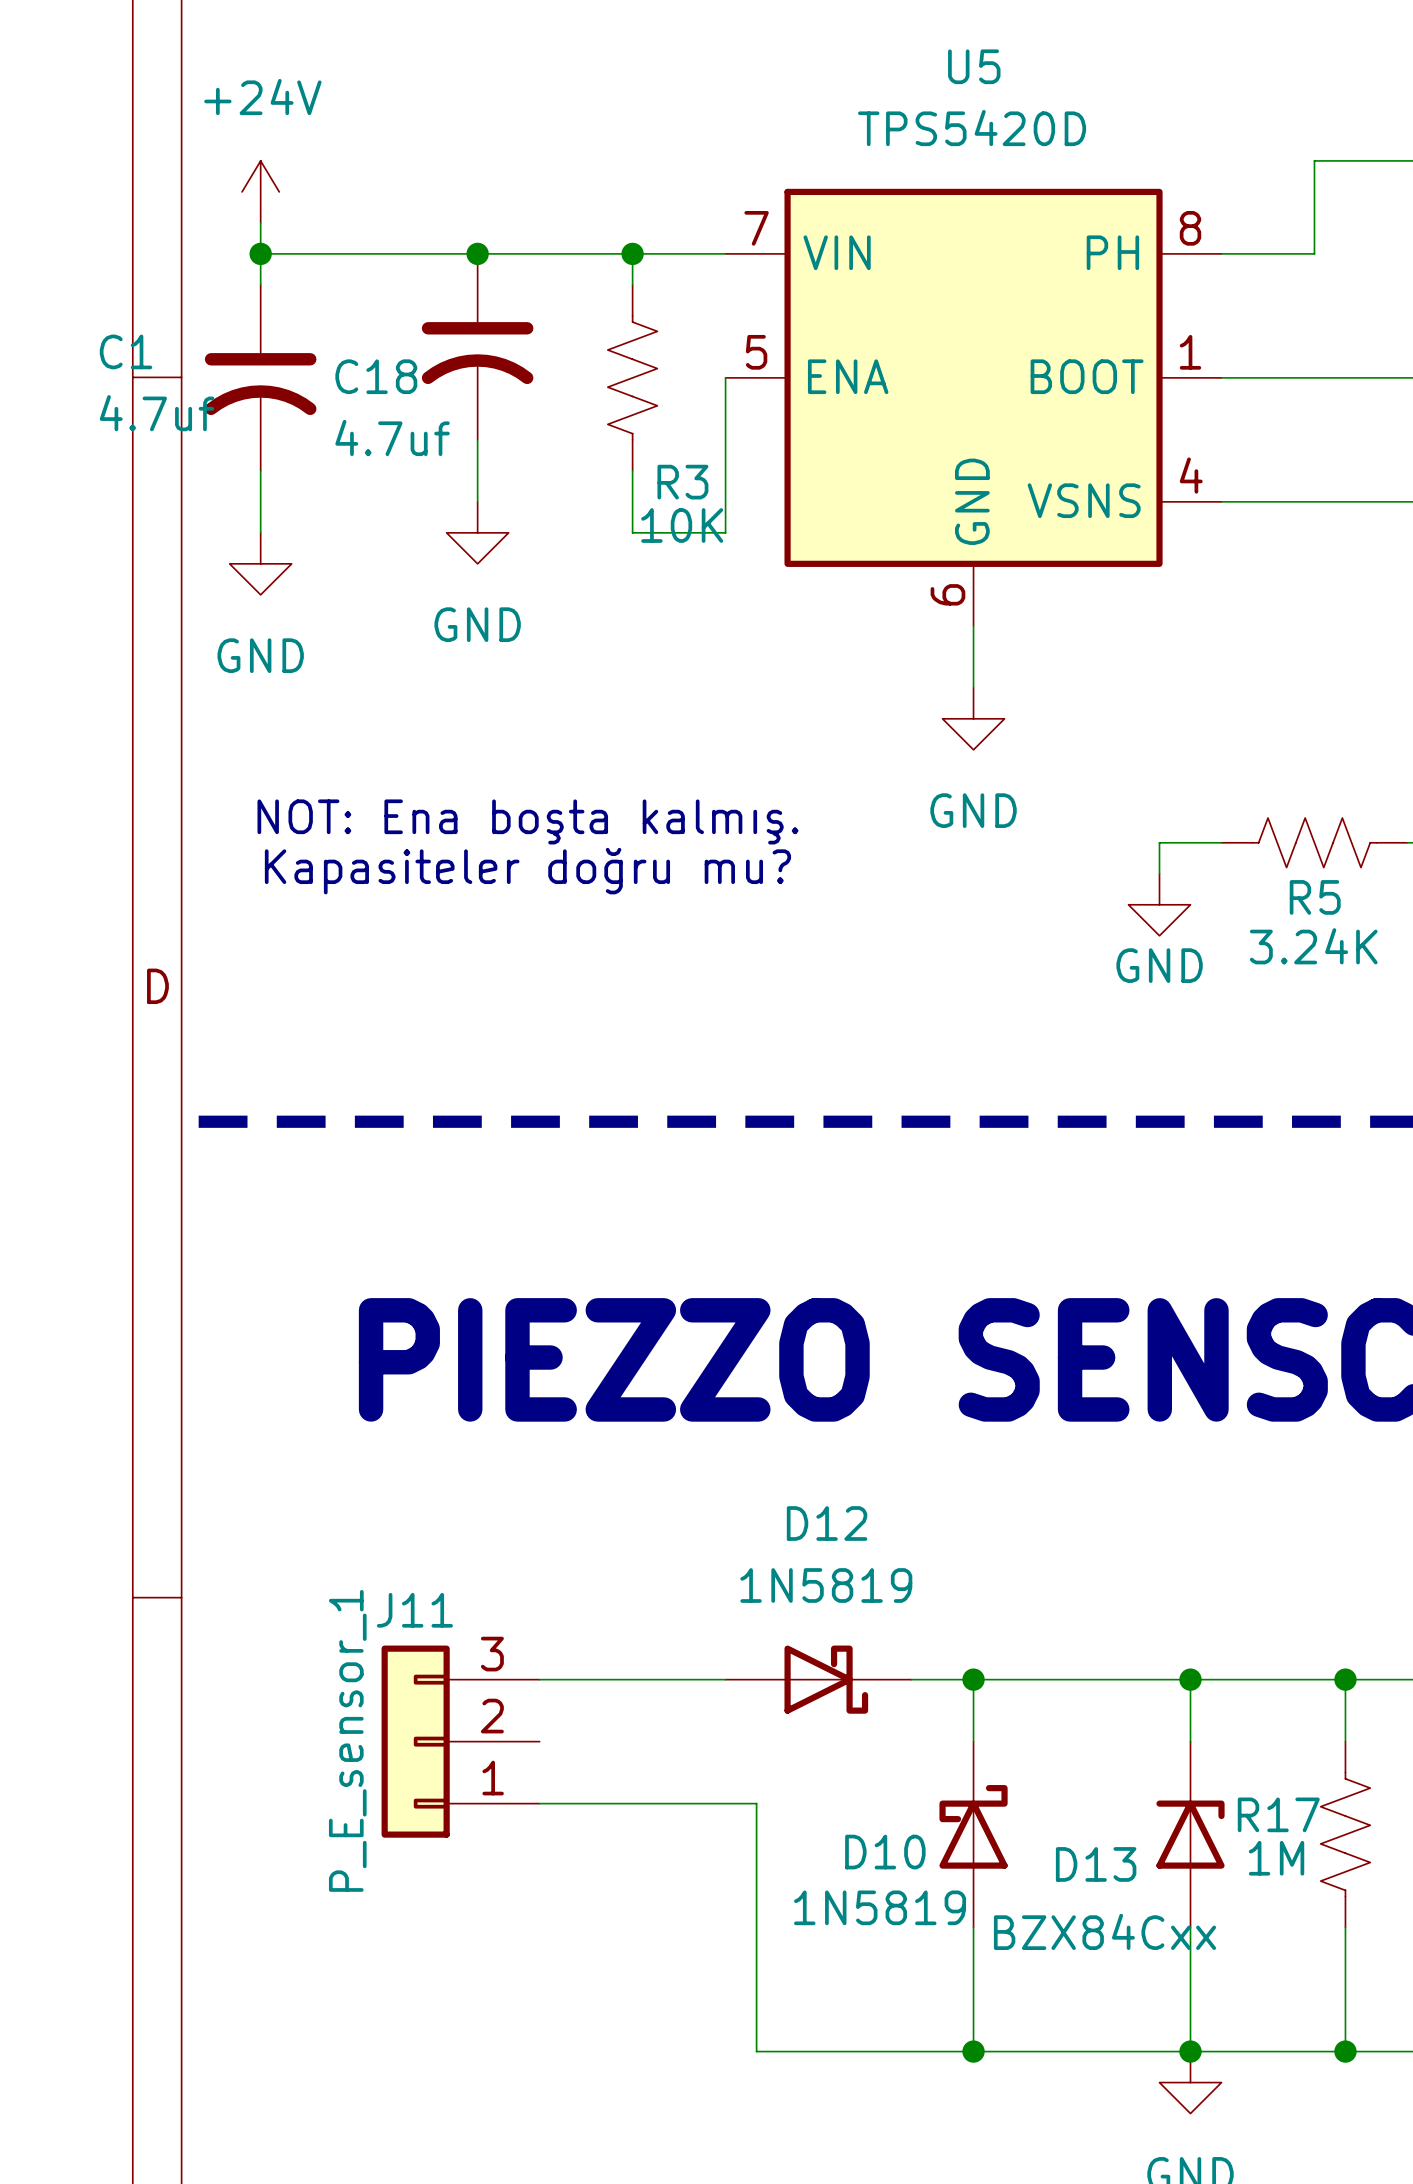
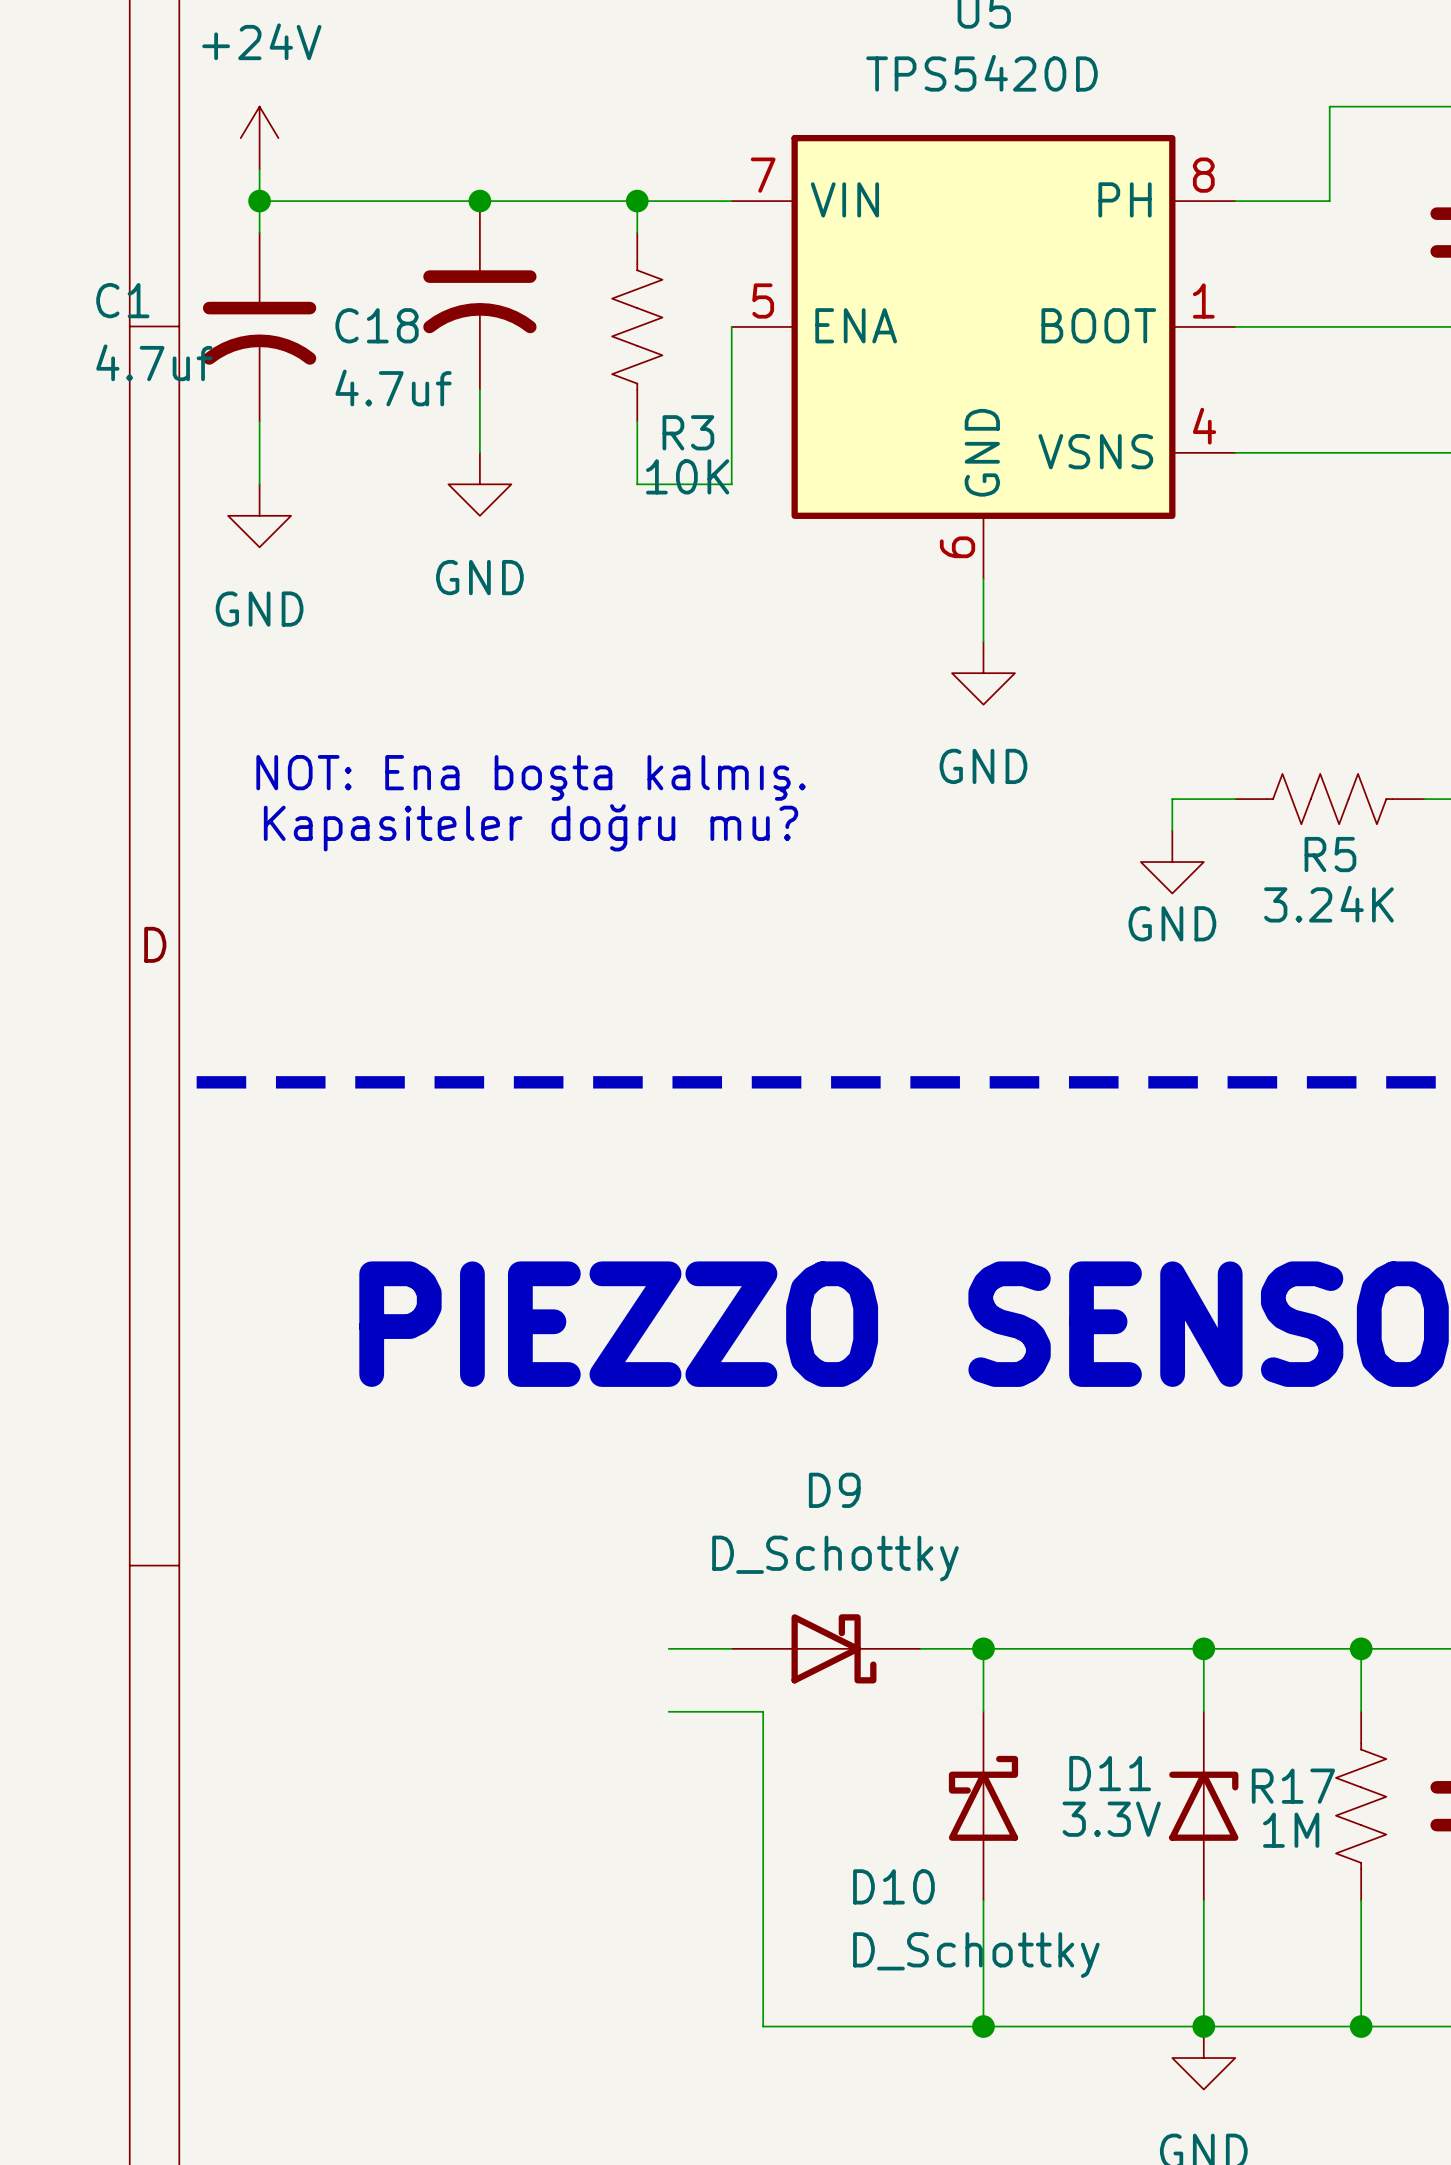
D12 name: D12 (827, 1523) -> D9 (834, 1490)
D12 value: 1N5819 (826, 1585) -> D_Schottky (835, 1558)
wire: (539, 1679) (663, 1679) -> none
J11: P_E_sensor_1 (460, 1741) -> none
wire: (539, 1803) (756, 1803) -> (668, 1711) (763, 1711) (763, 1774)
D10 name position: D10 (885, 1852) -> D10 (893, 1886)
D13 name: D13 (1096, 1864) -> D11 (1110, 1773)
D10 value: 1N5819 (880, 1907) -> D_Schottky (976, 1955)
D13 value: BZX84Cxx (1104, 1931) -> 3.3V (1111, 1819)

